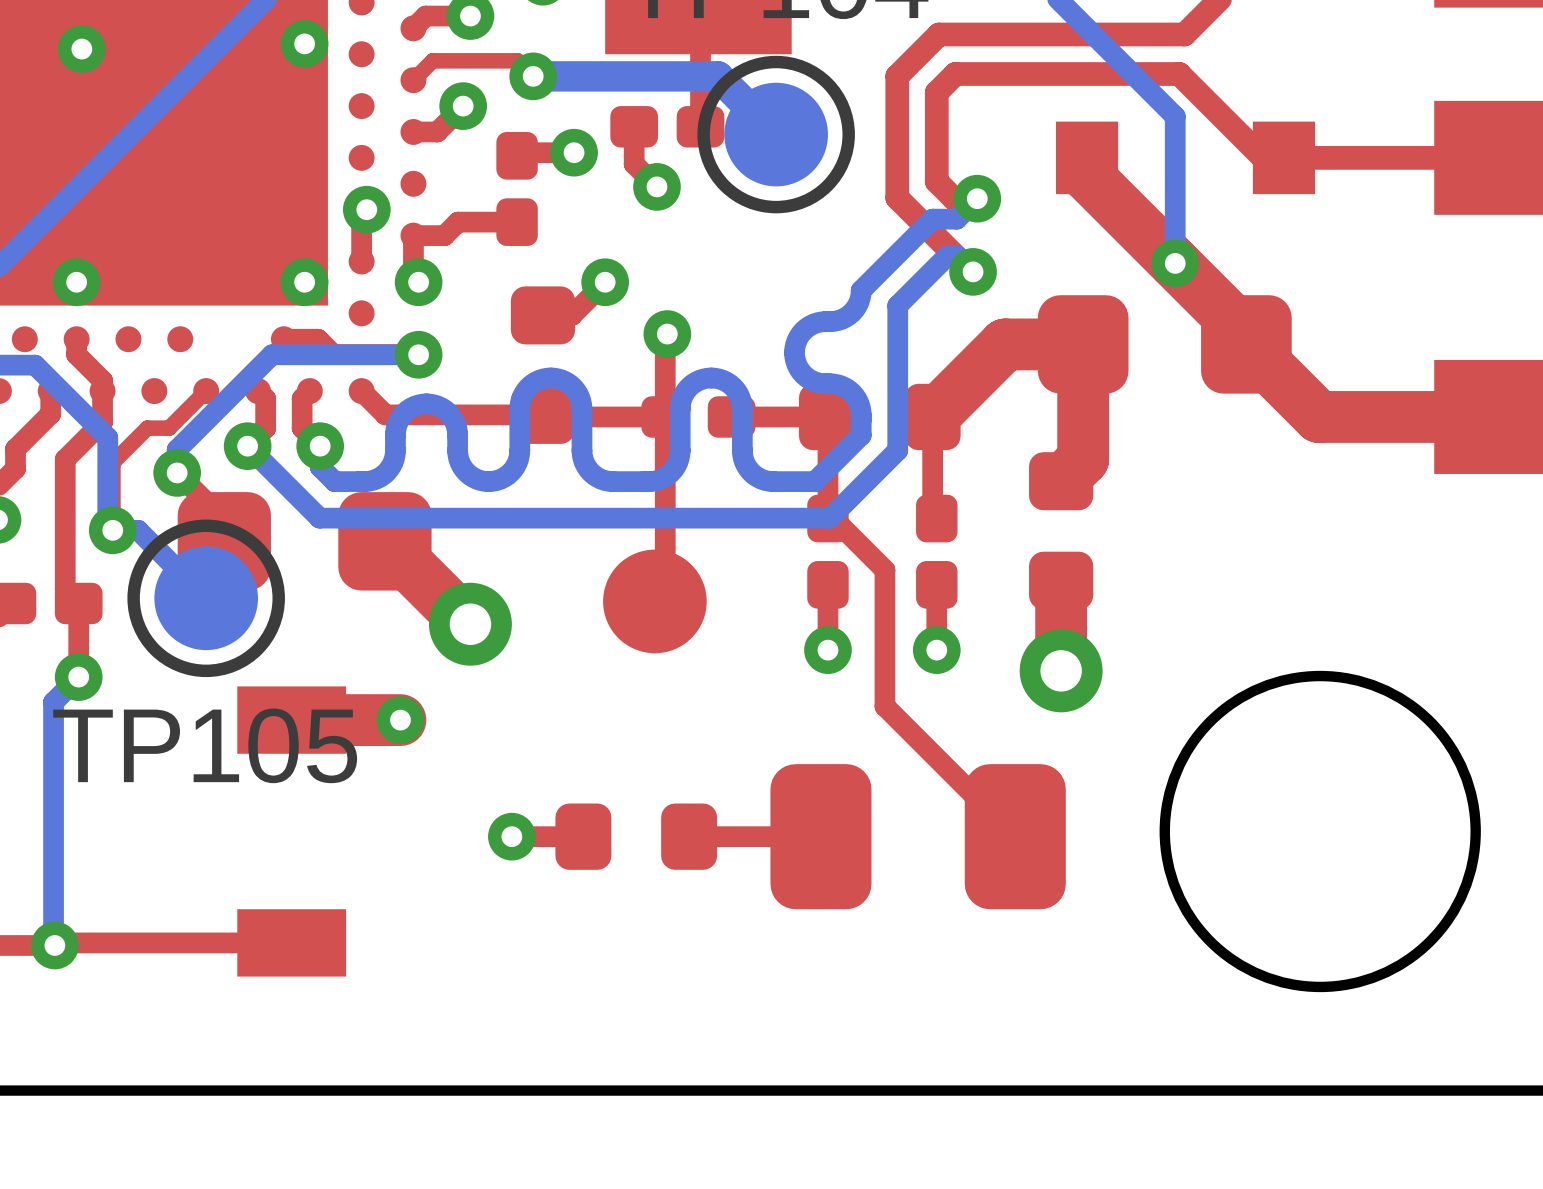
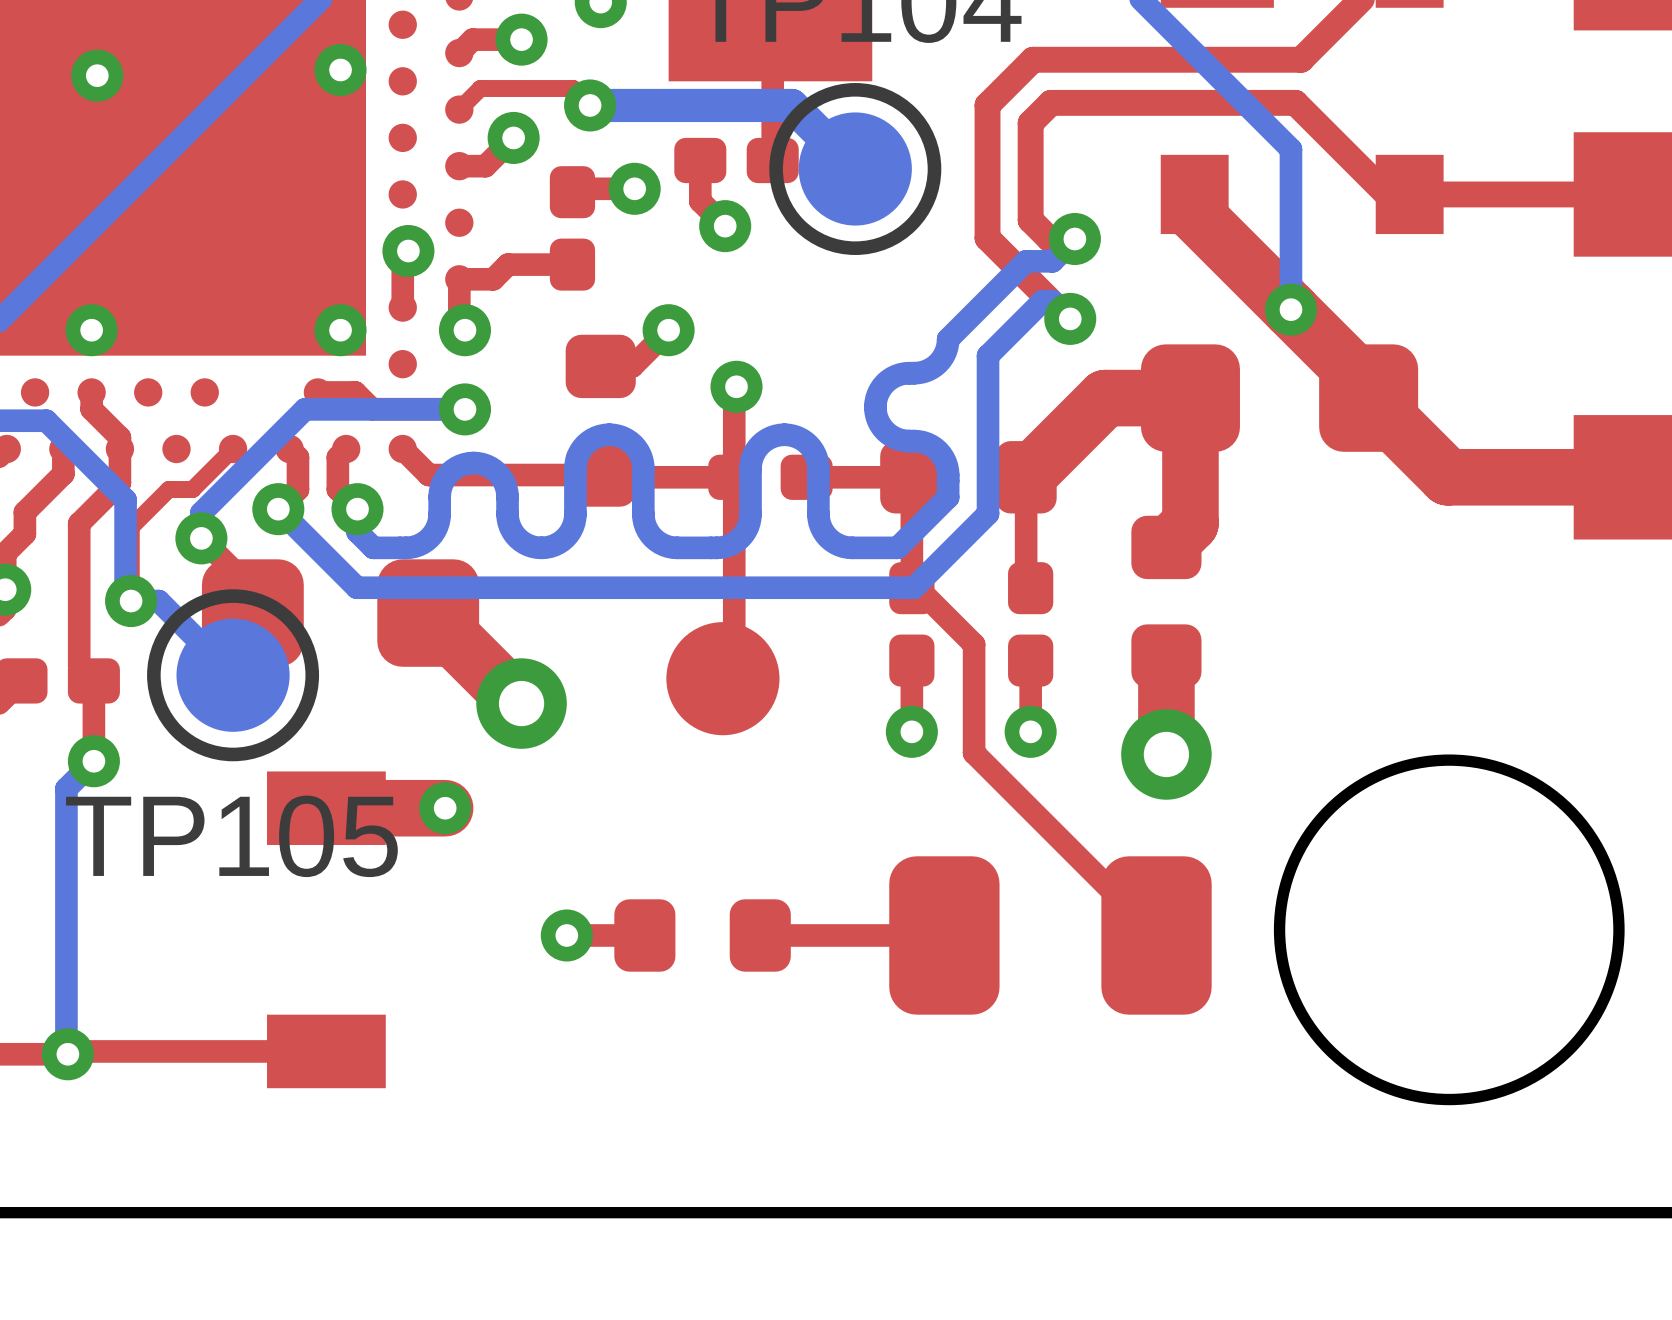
top track: (884, 669) (884, 706) (1015, 836) -> (974, 753) (1156, 935)
part position: (918, 836) -> (1050, 935)

